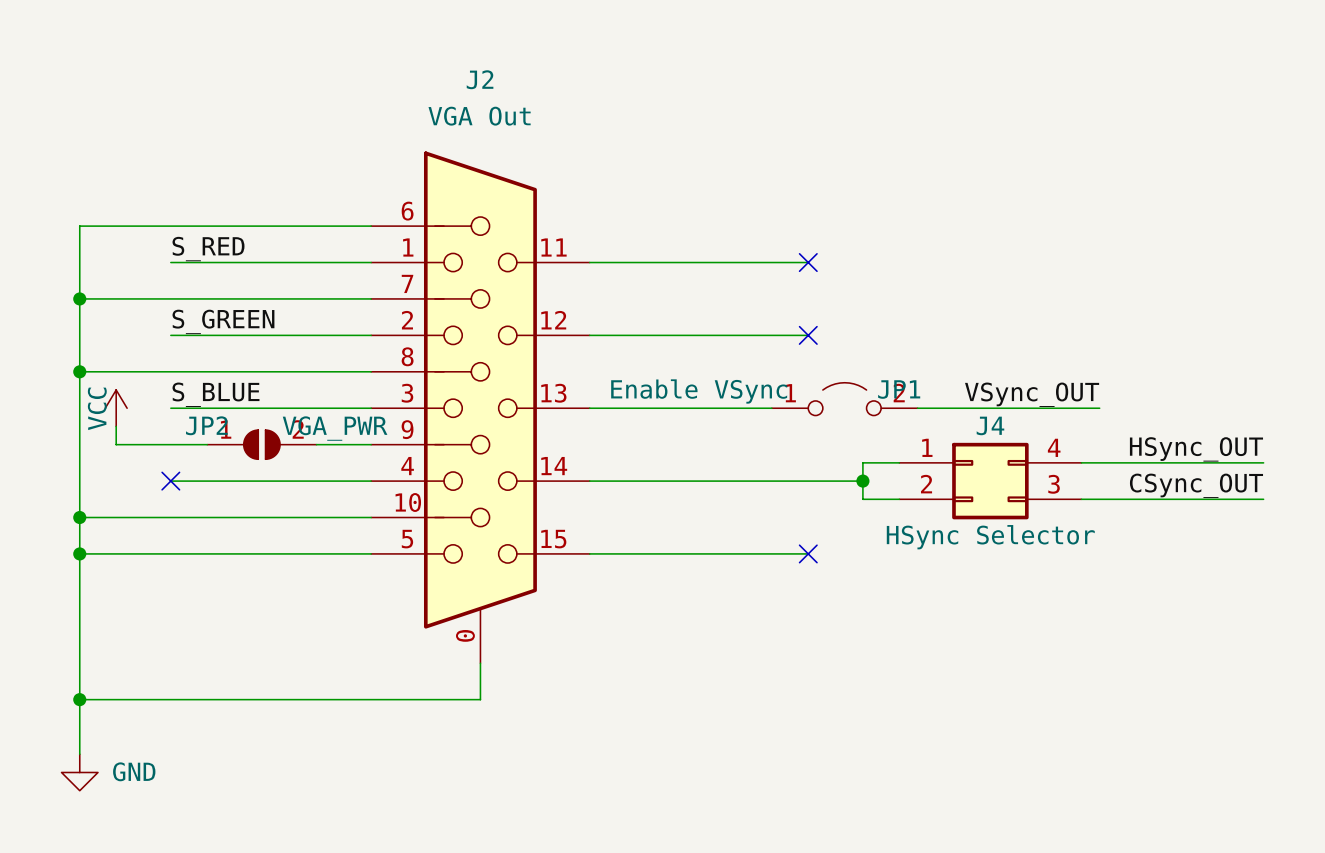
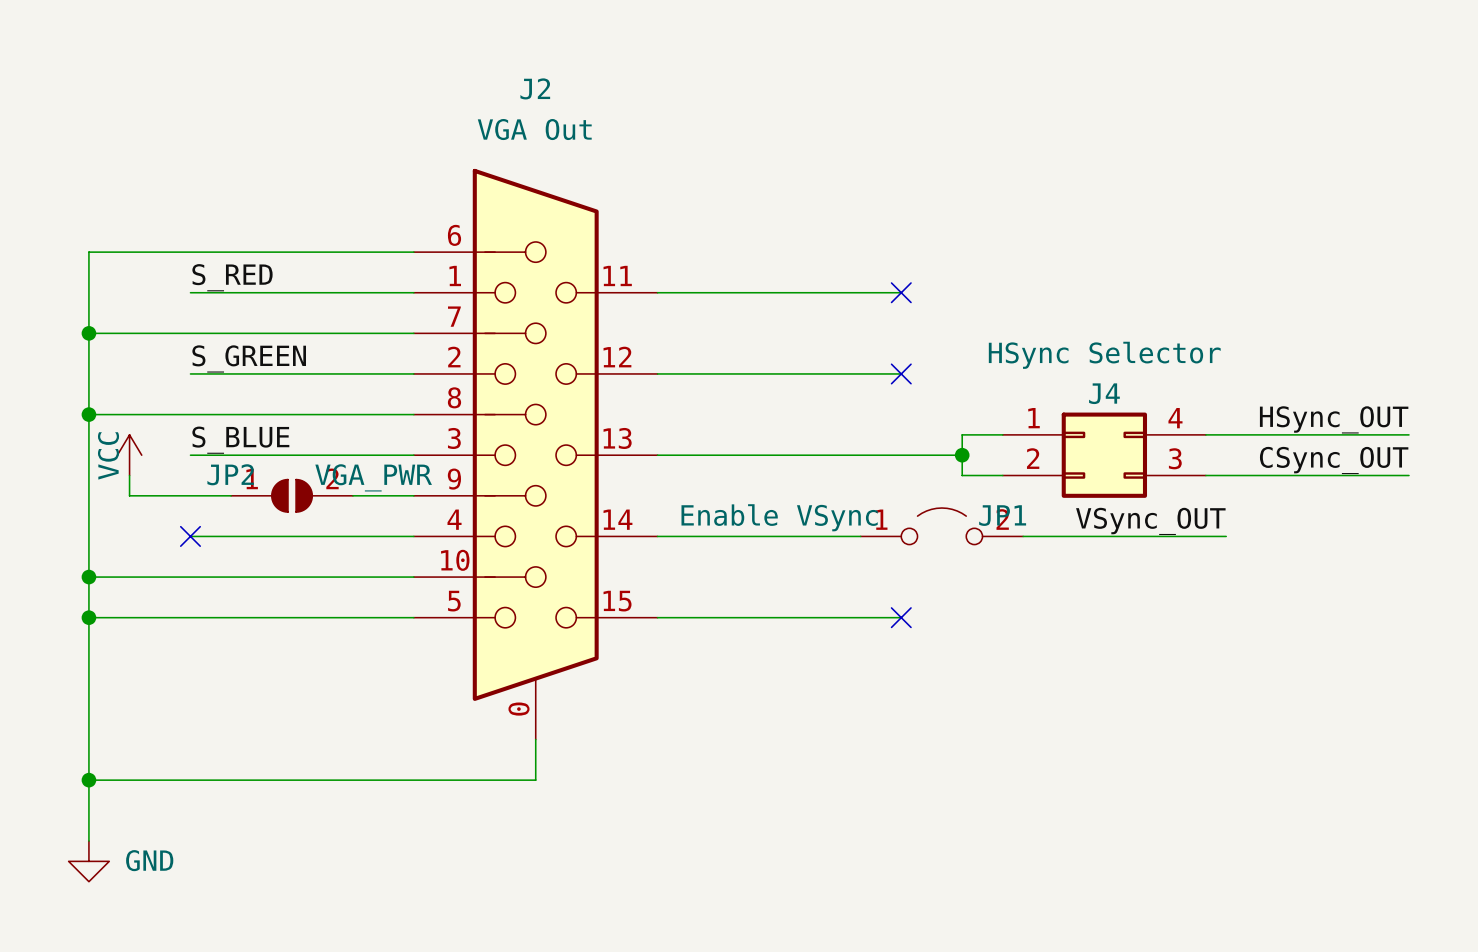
label position: VSync_OUT (1032, 394) -> VSync_OUT (1150, 521)
JP1 position: (844, 399) -> (941, 526)
wire: (917, 408) (1099, 408) -> (1023, 536) (1226, 536)
label position: HSync_OUT (1196, 449) -> HSync_OUT (1334, 419)
wire: (899, 462) (862, 462) (862, 499) (899, 499) -> (1002, 434) (962, 434) (962, 475) (1002, 475)
wire: (1081, 462) (1263, 462) -> (1205, 475) (1408, 475)
wire: (771, 481) (862, 481) -> (860, 455) (962, 455)
junction position: (862, 481) -> (962, 455)
J4 position: (990, 481) -> (1104, 455)
label position: CSync_OUT (1196, 485) -> CSync_OUT (1334, 460)
wire: (1081, 499) (1263, 499) -> (1205, 434) (1408, 434)
J4 value position: HSync Selector (990, 537) -> HSync Selector (1104, 355)

